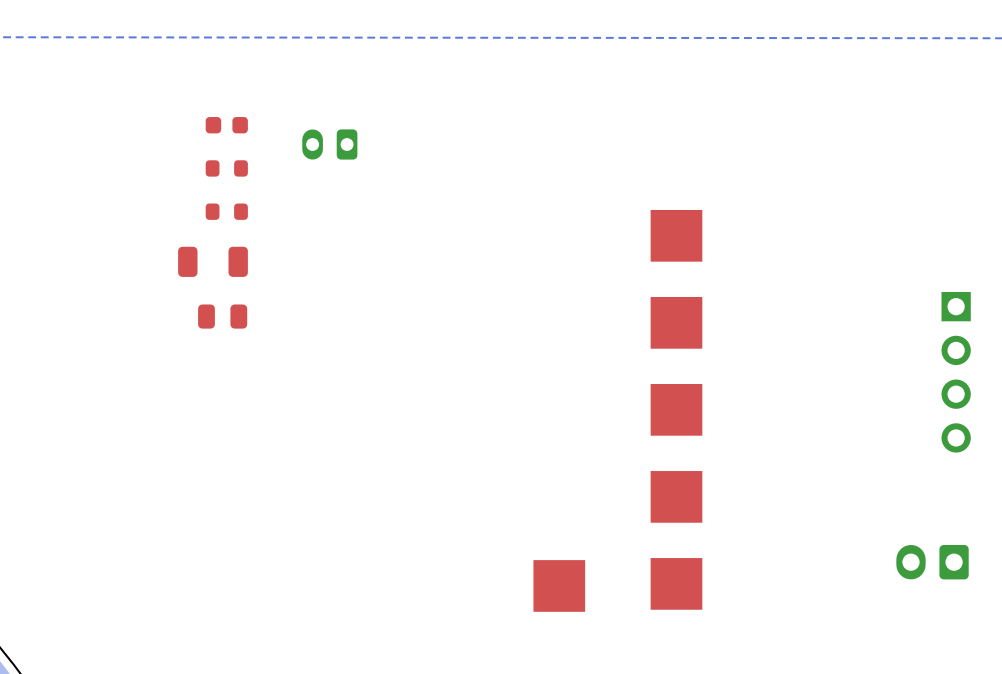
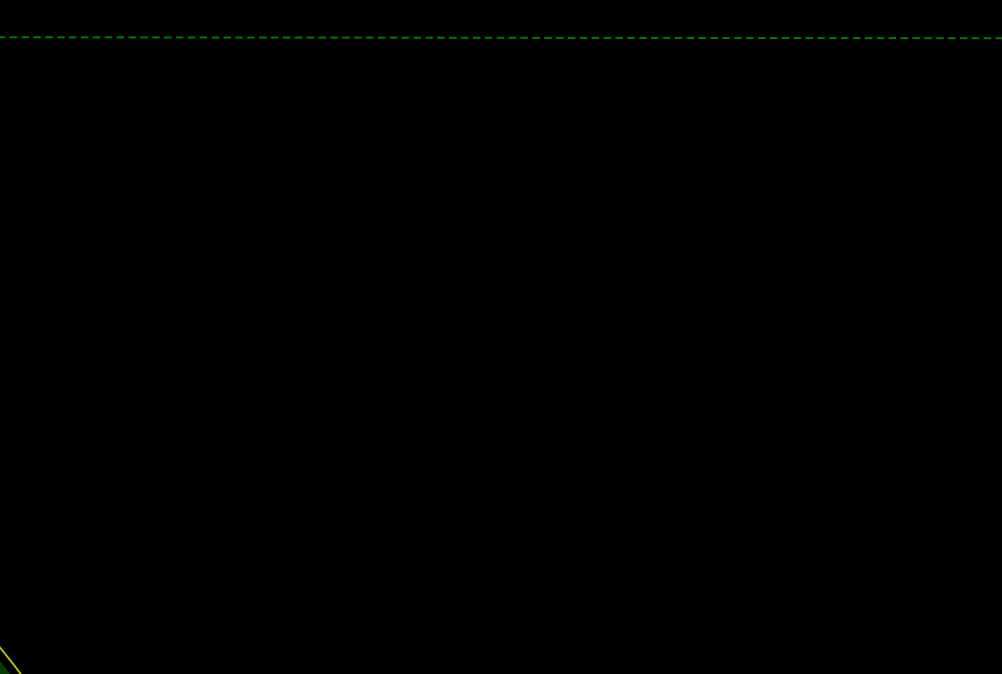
part: (226, 125) -> none
part: (329, 144) -> none
part: (226, 168) -> none
part: (226, 211) -> none
part: (676, 235) -> none
part: (213, 261) -> none
part: (222, 316) -> none
part: (676, 322) -> none
part: (956, 372) -> none
part: (676, 409) -> none
part: (676, 496) -> none
part: (932, 562) -> none
part: (676, 583) -> none
part: (559, 585) -> none

